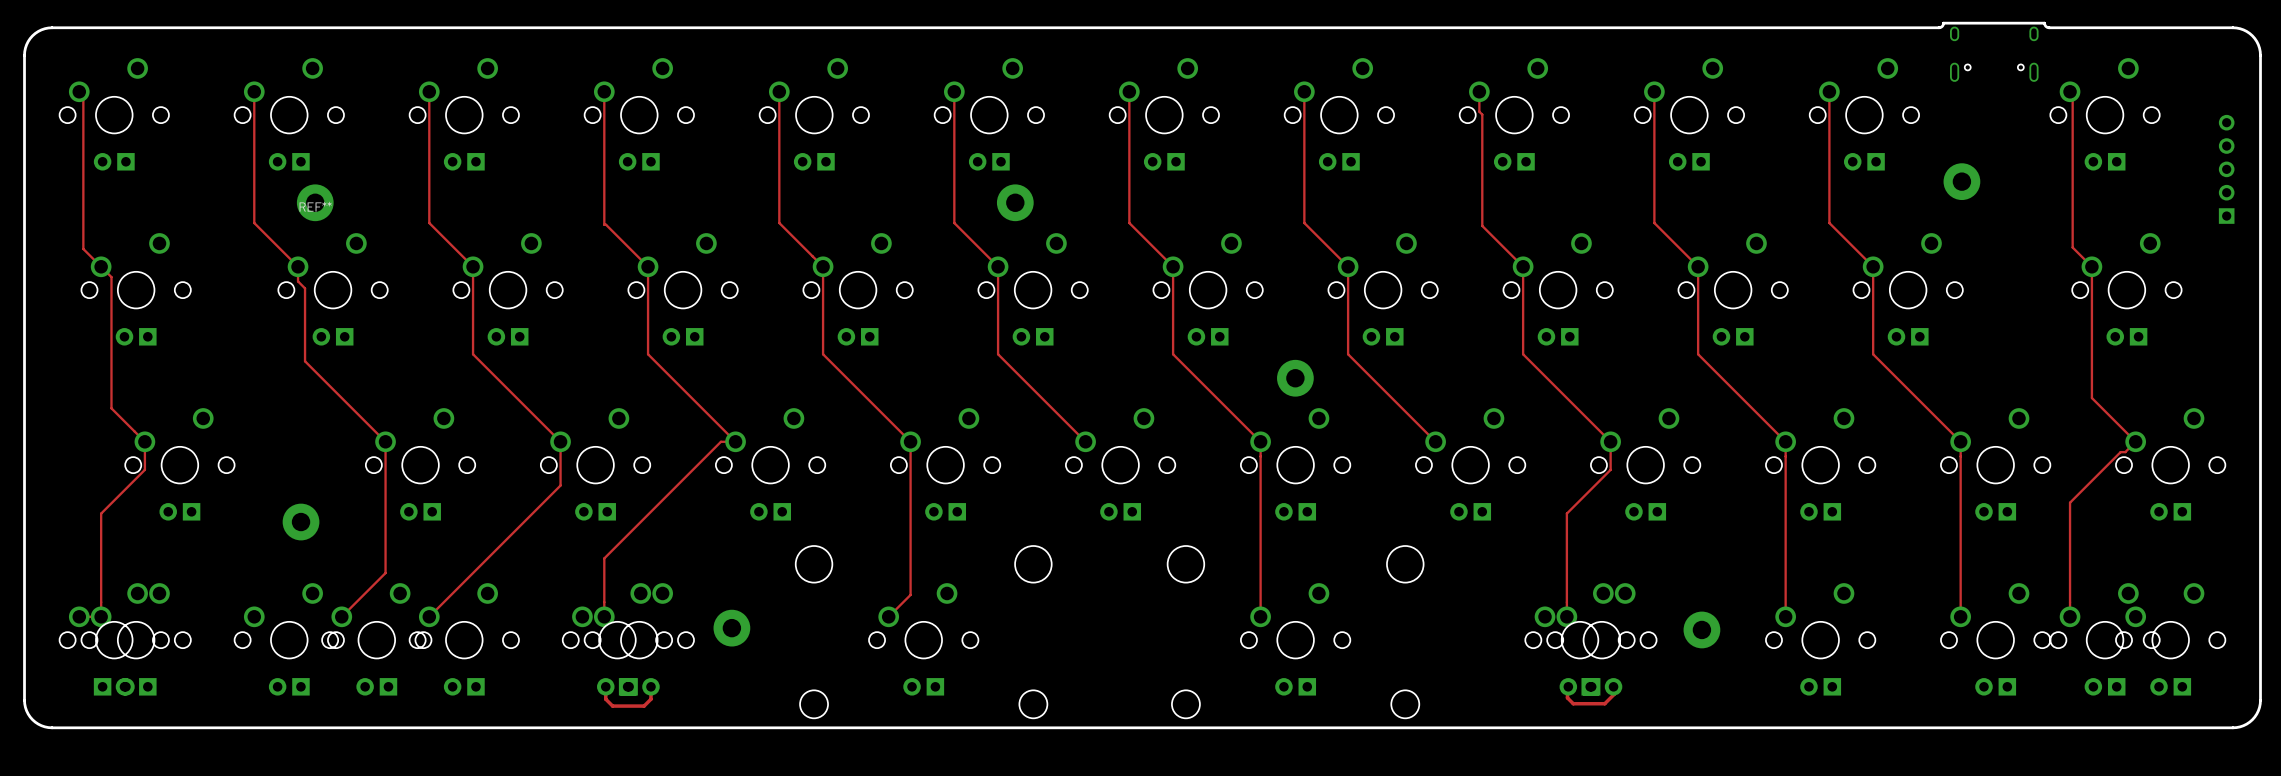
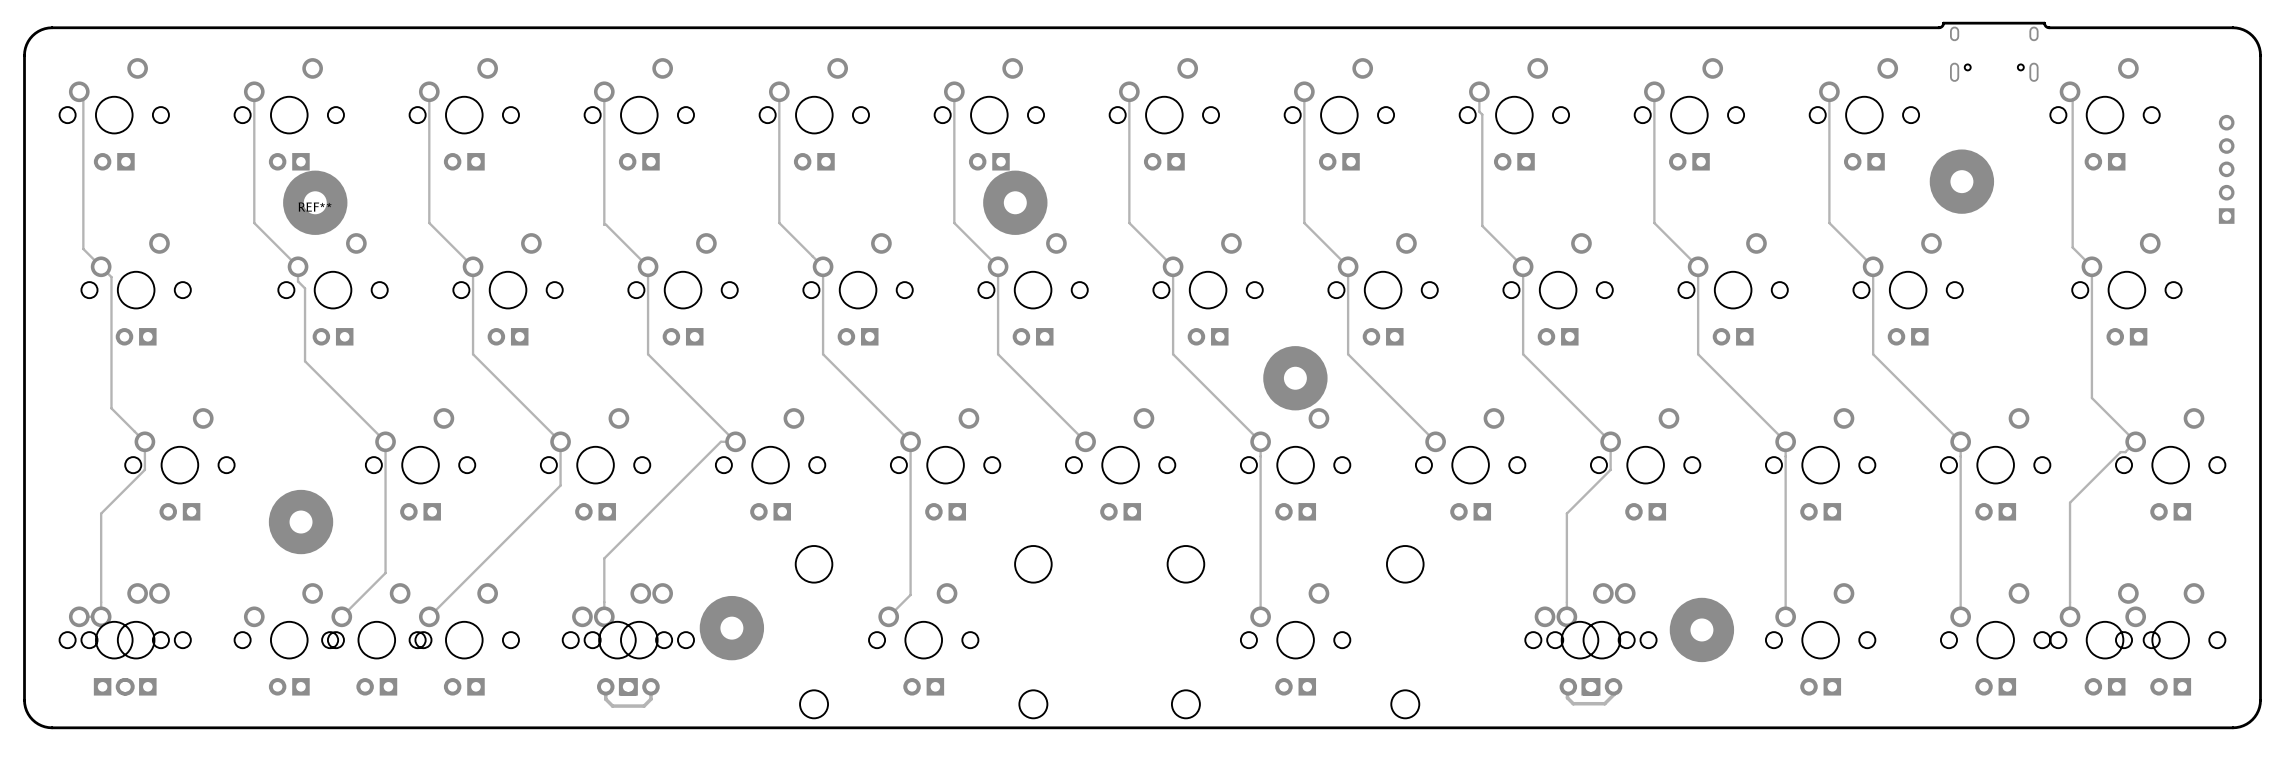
REF** footprint: [23, 21, 2262, 730] -> [23, 21, 2262, 730]

